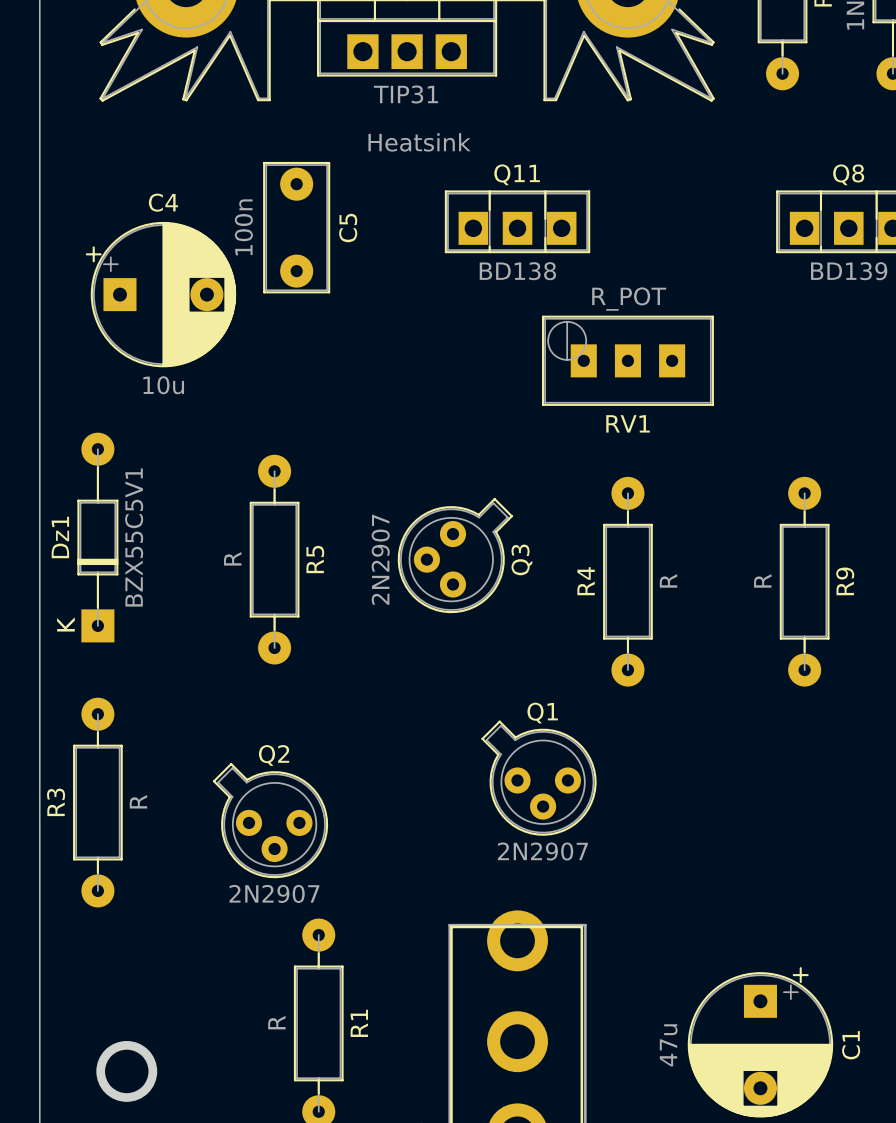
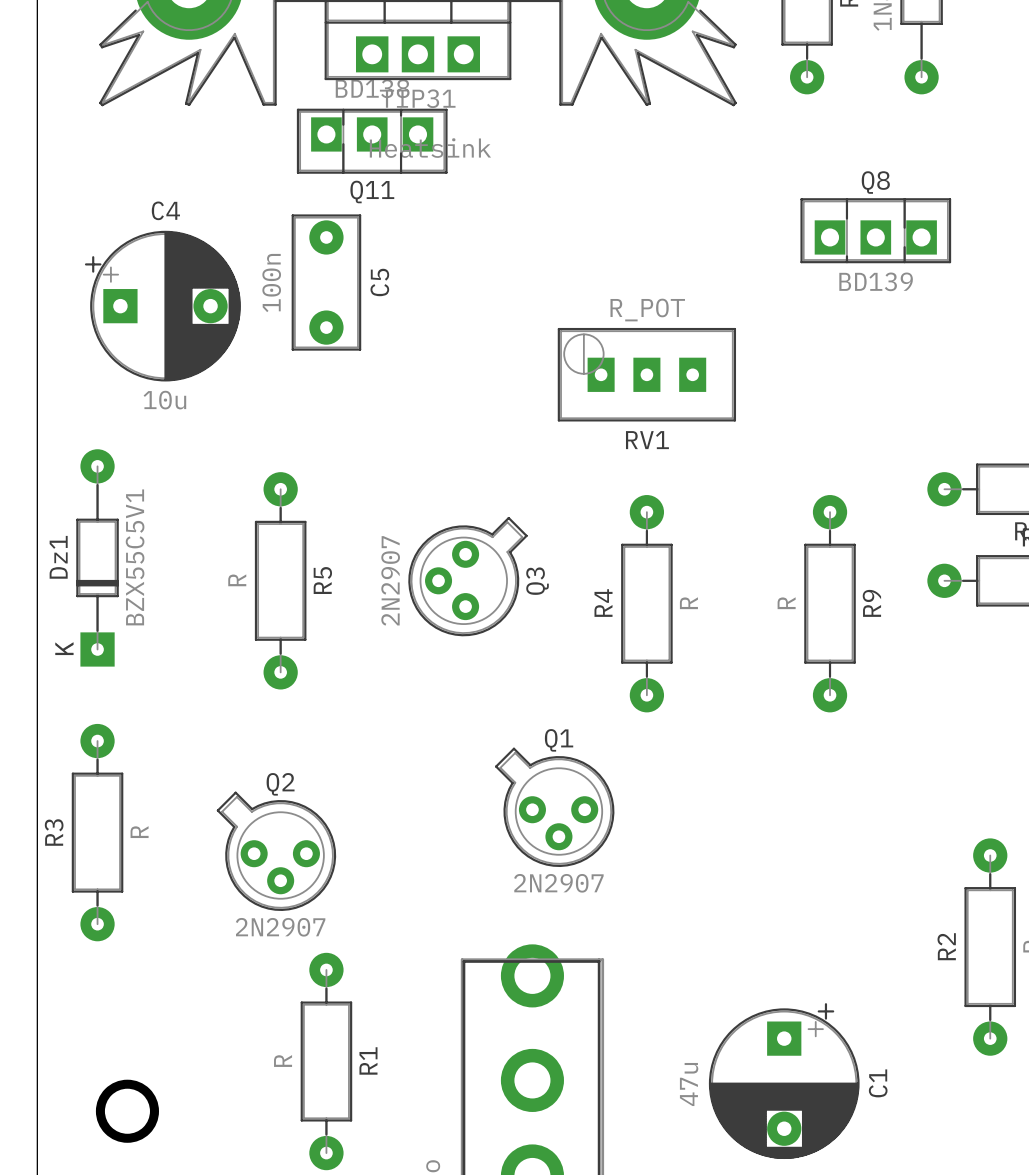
Q11 rotation: 0° (517, 221) -> 180° (372, 141)
Q11 position: (517, 221) -> (372, 141)
C5 position: (296, 227) -> (326, 282)

